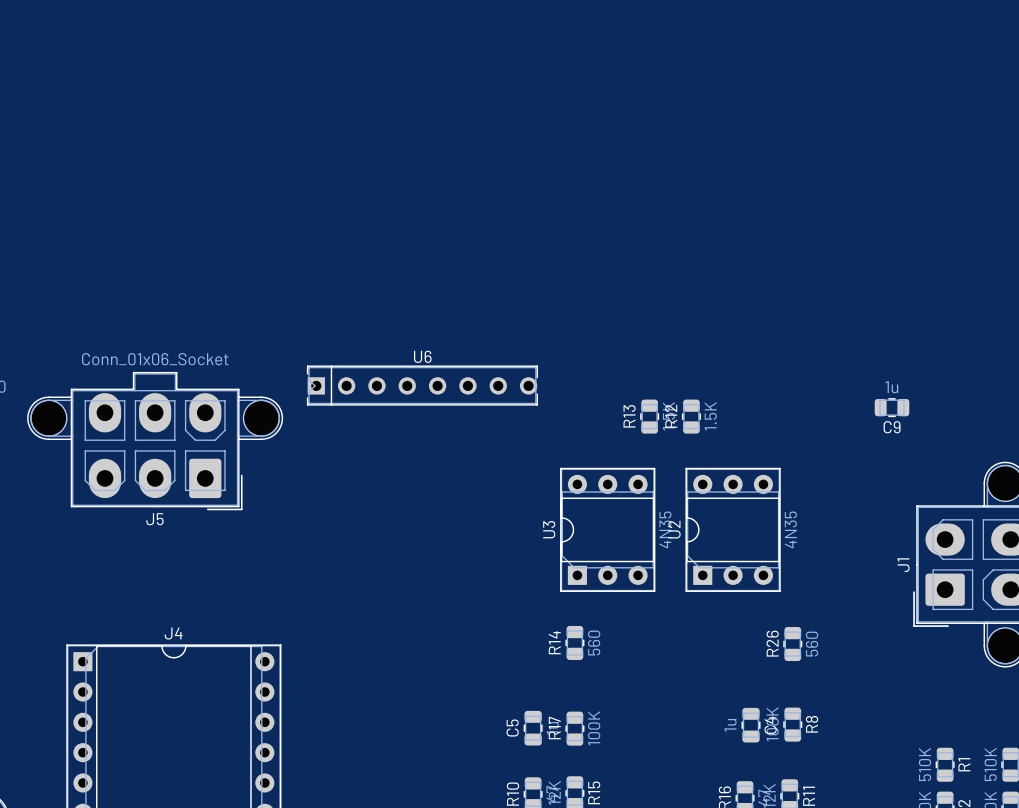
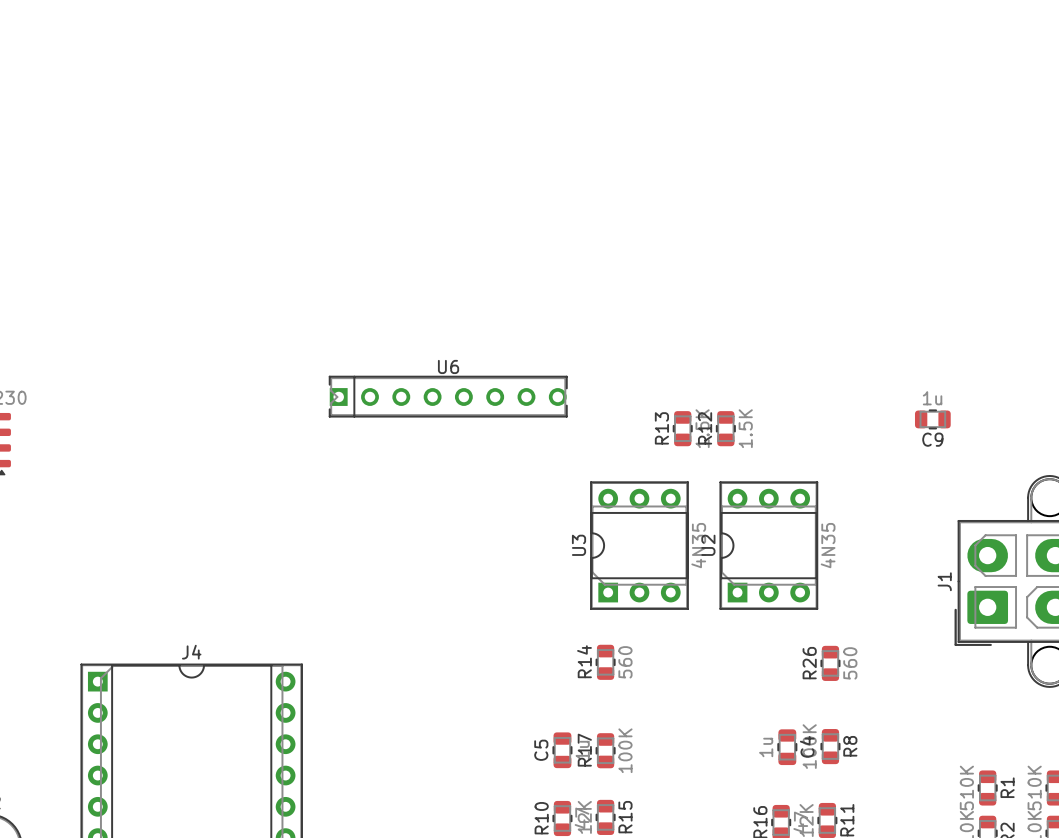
J5: Conn_01x06_Socket (155, 441) -> none

